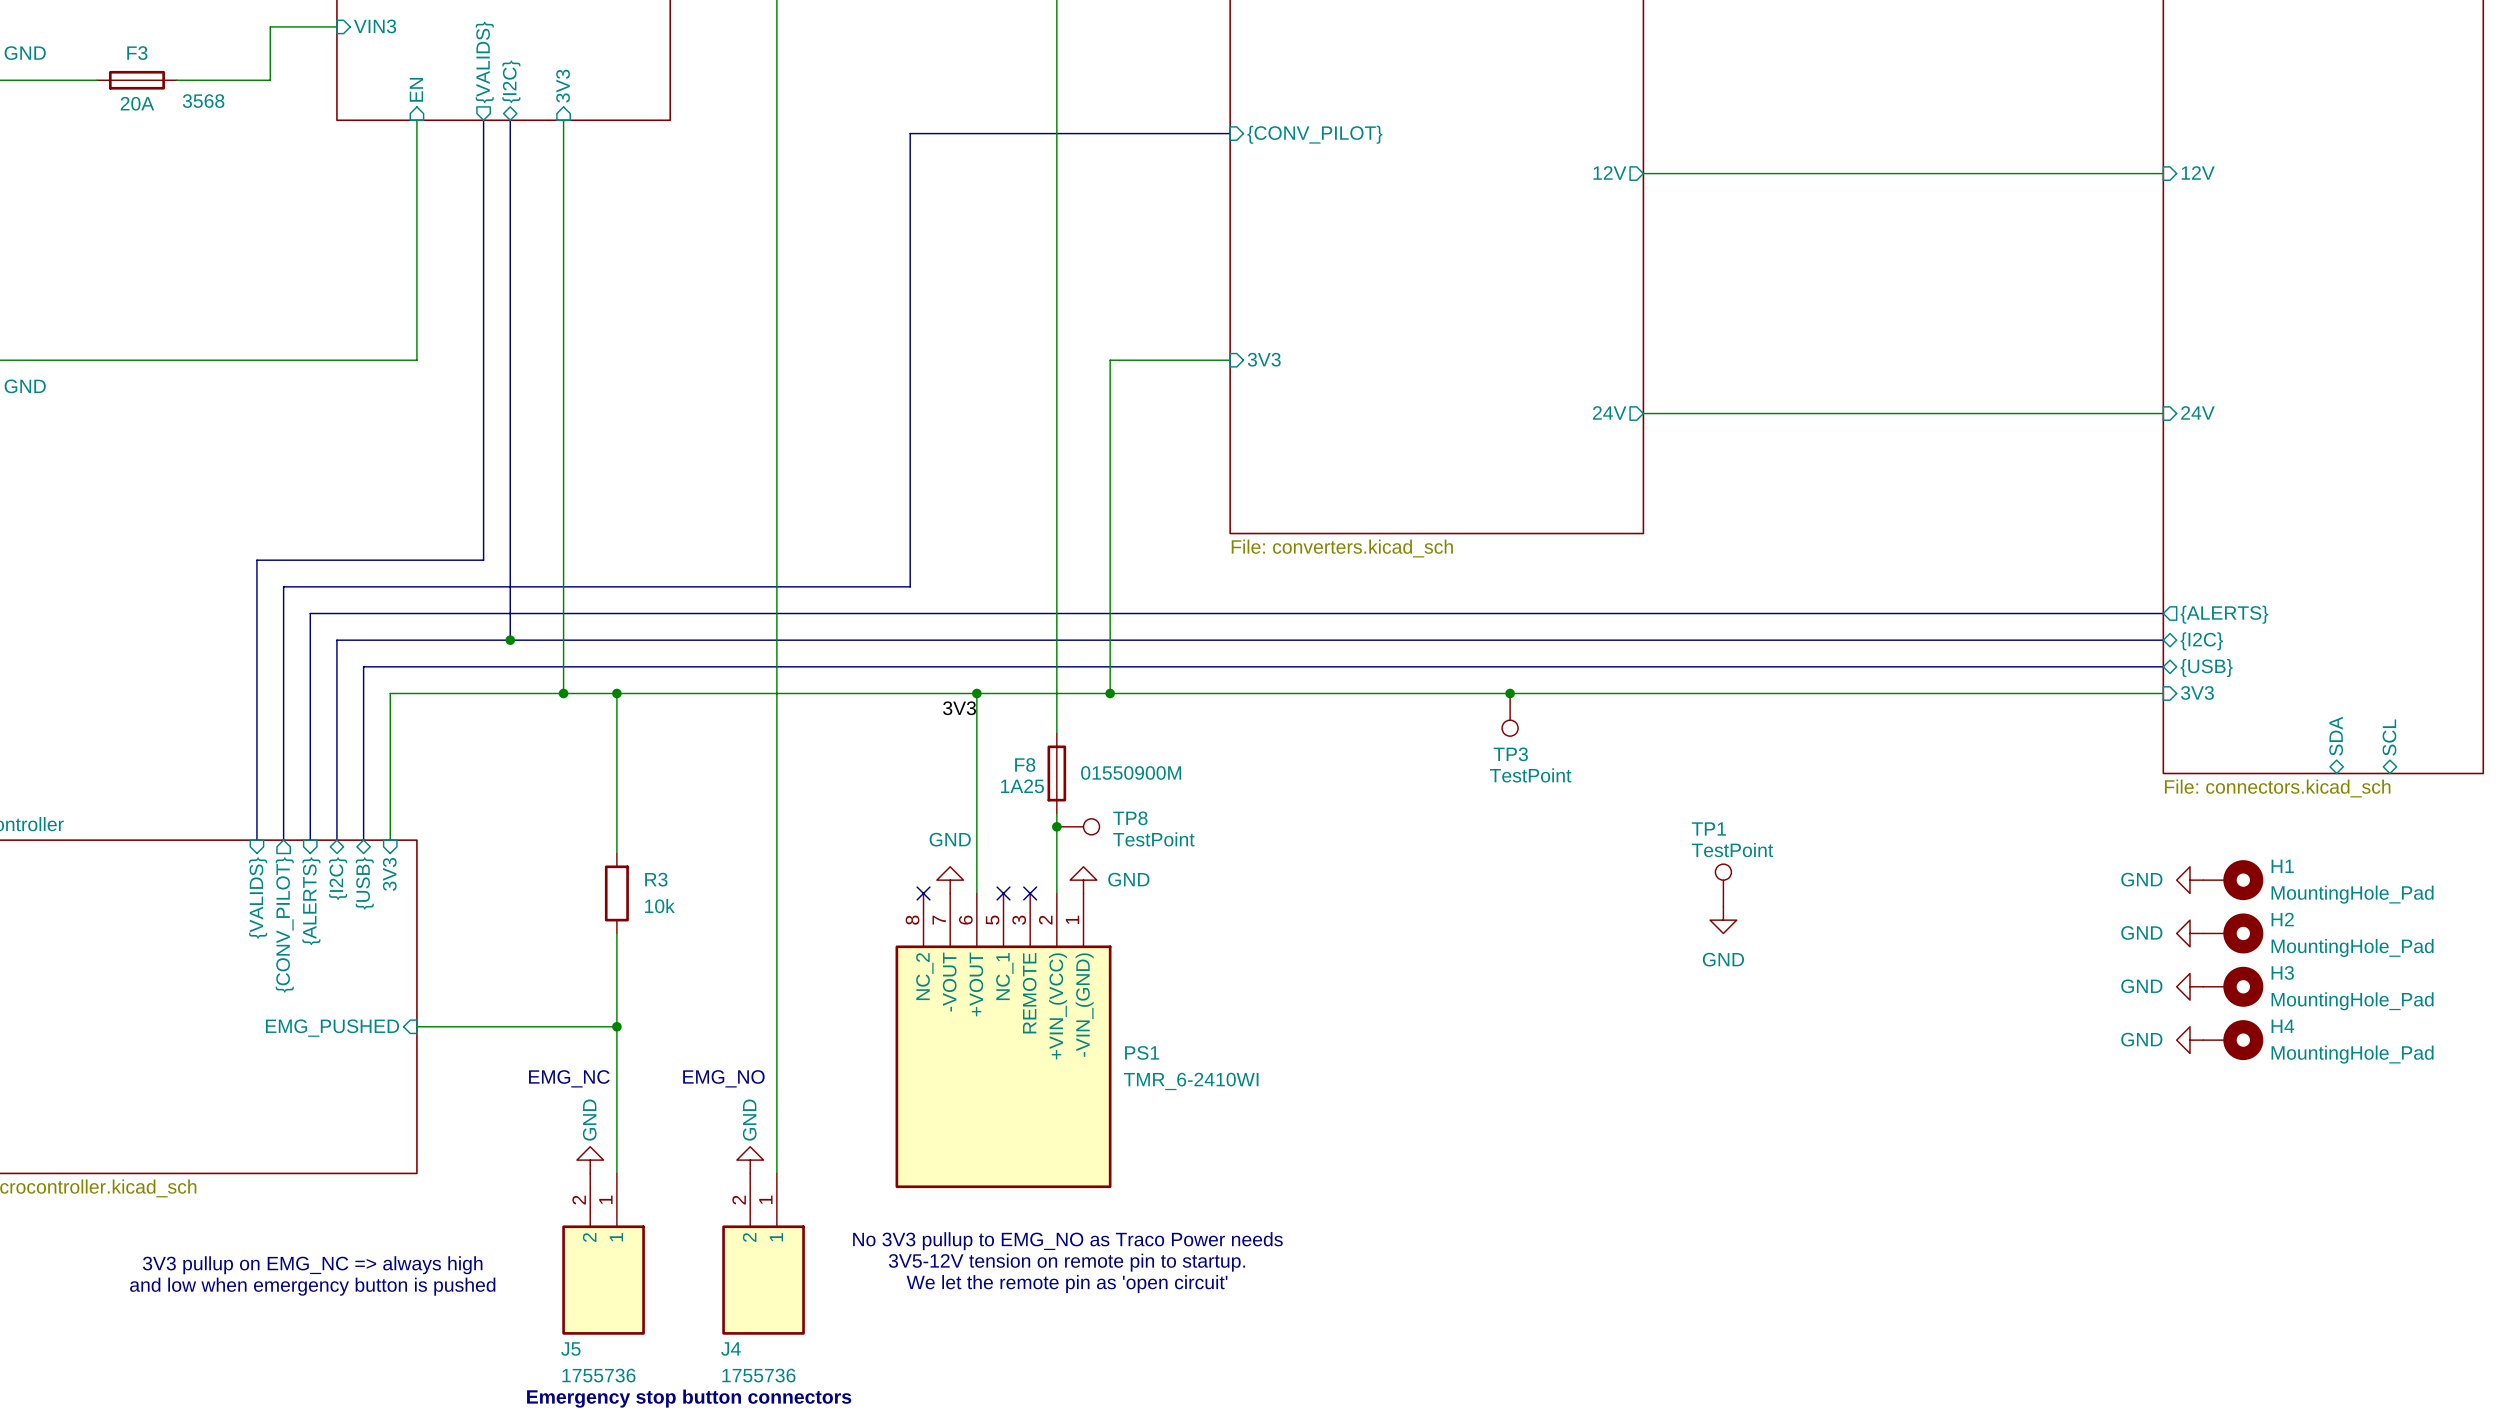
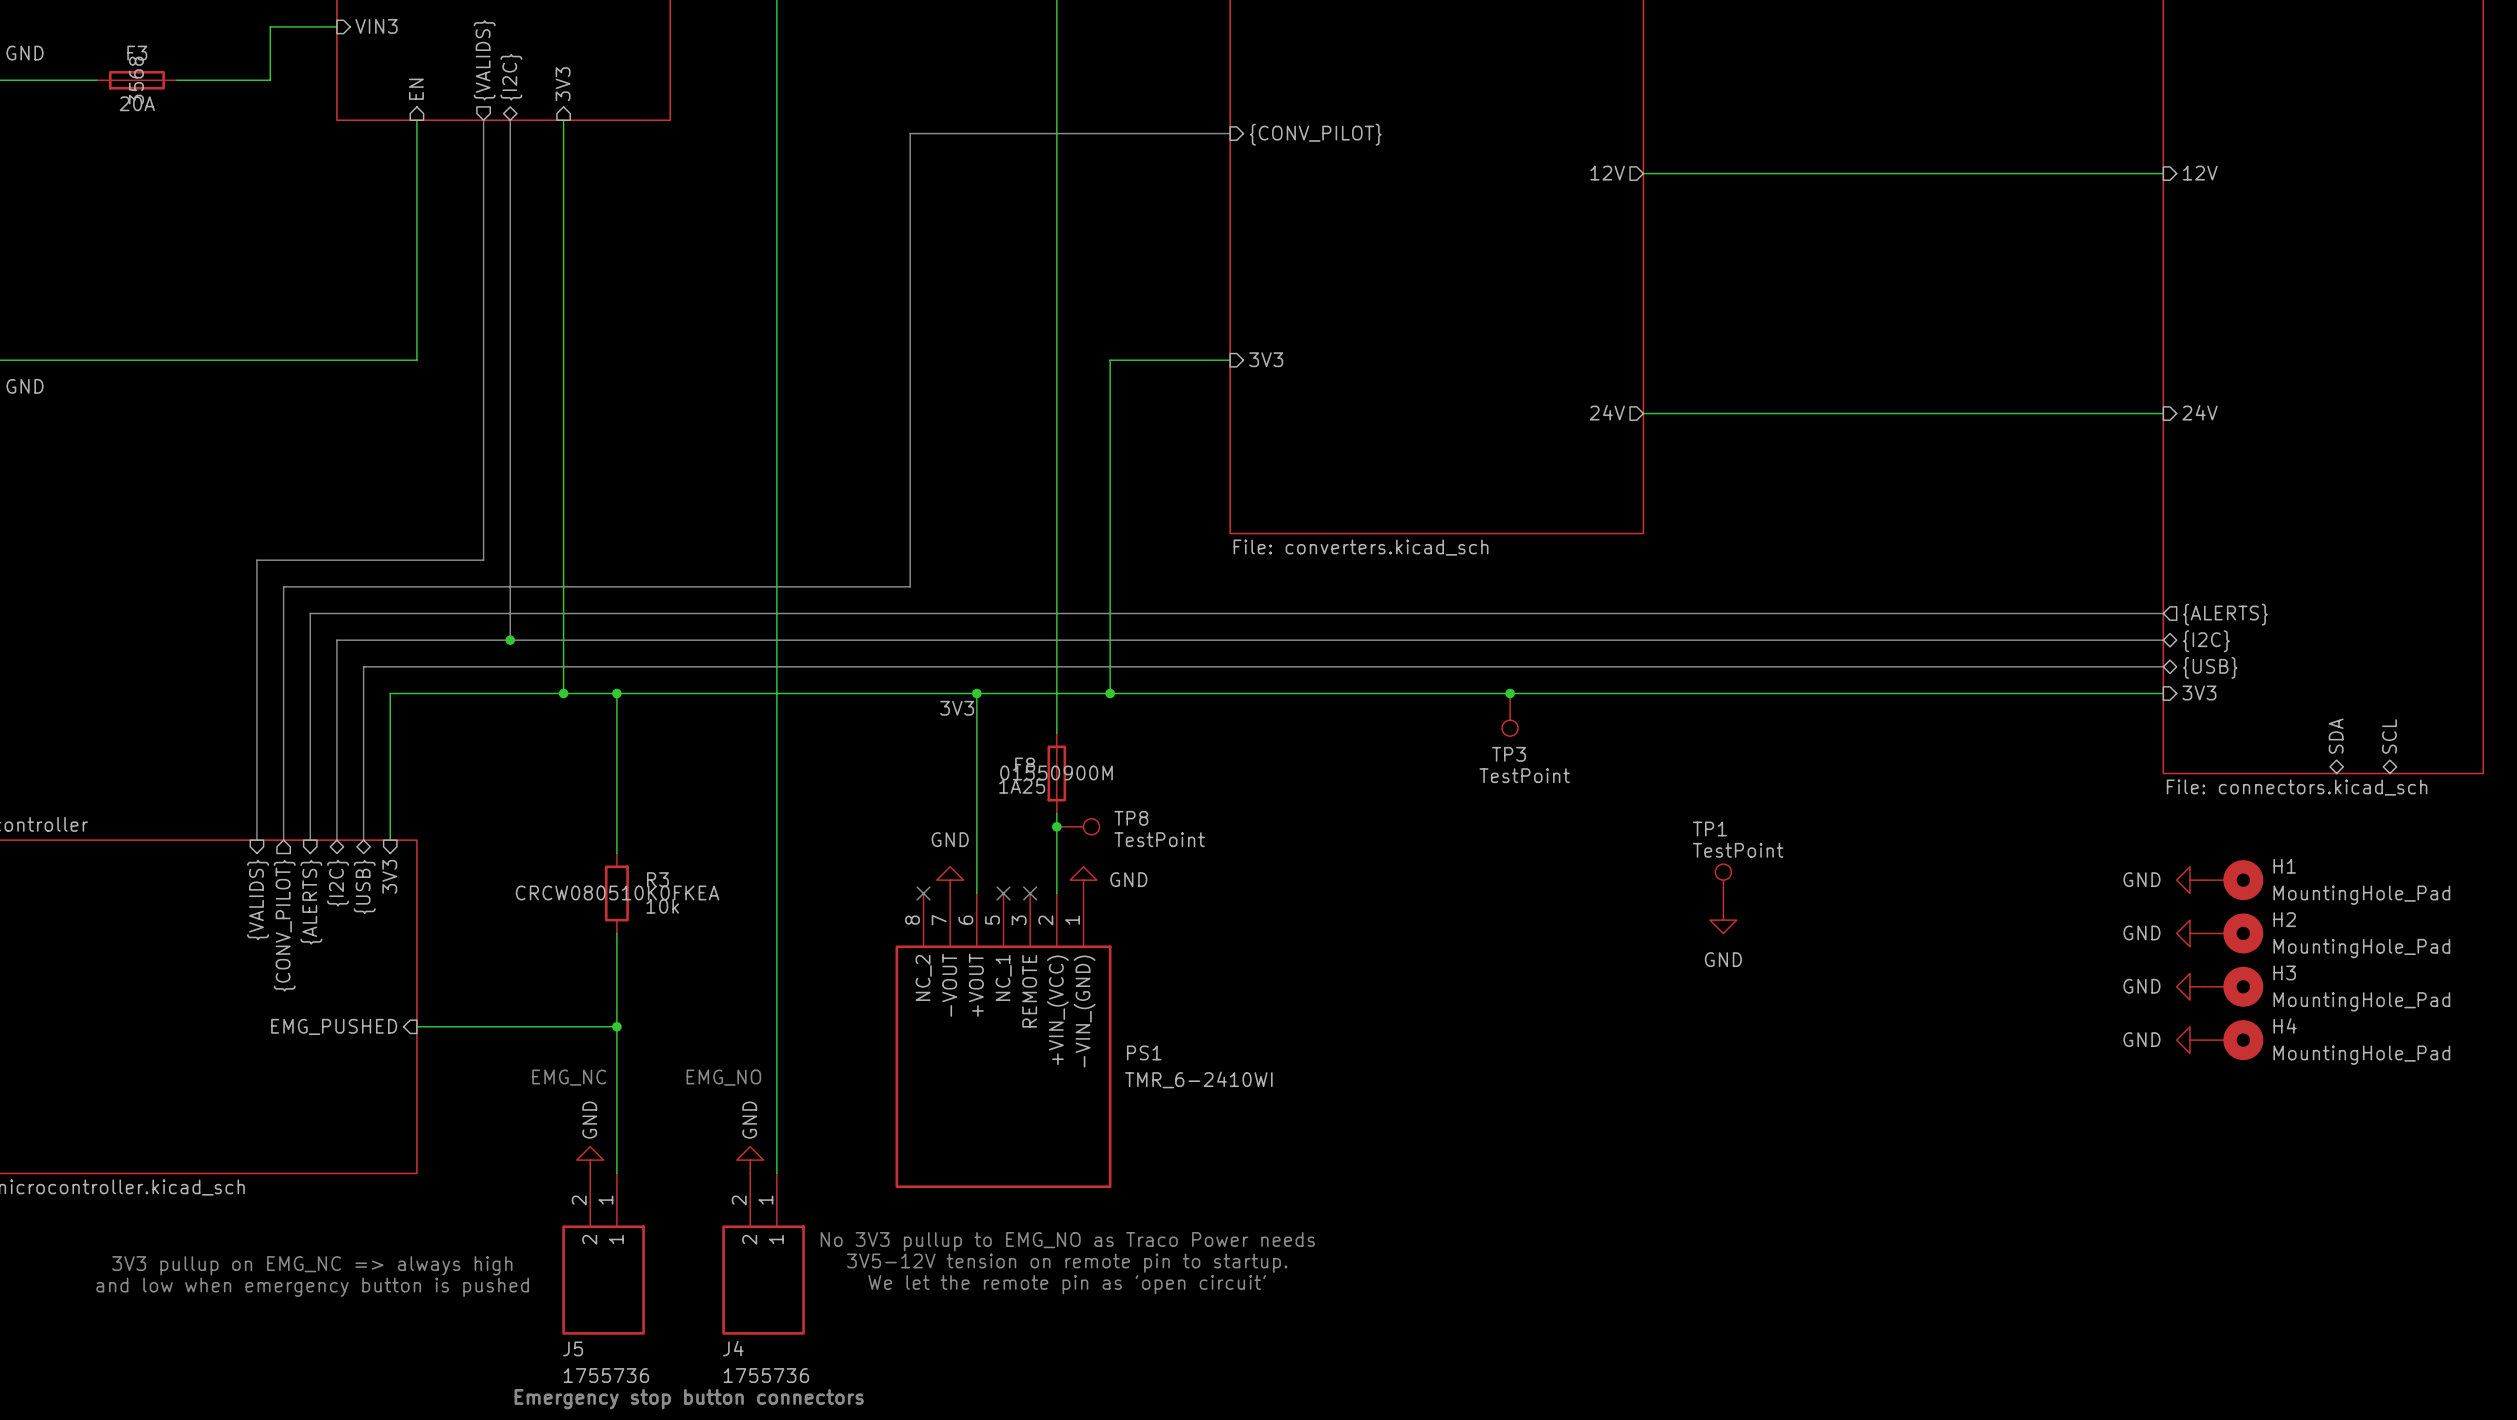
F3 text rotation: 0° (203, 101) -> 90° counterclockwise (136, 80)
F3 text position: 3568 (203, 101) -> 3568 (136, 80)
F8 text position: 01550900M (1131, 772) -> 01550900M (1056, 772)
R3 text: none -> CRCW080510K0FKEA (617, 892)

